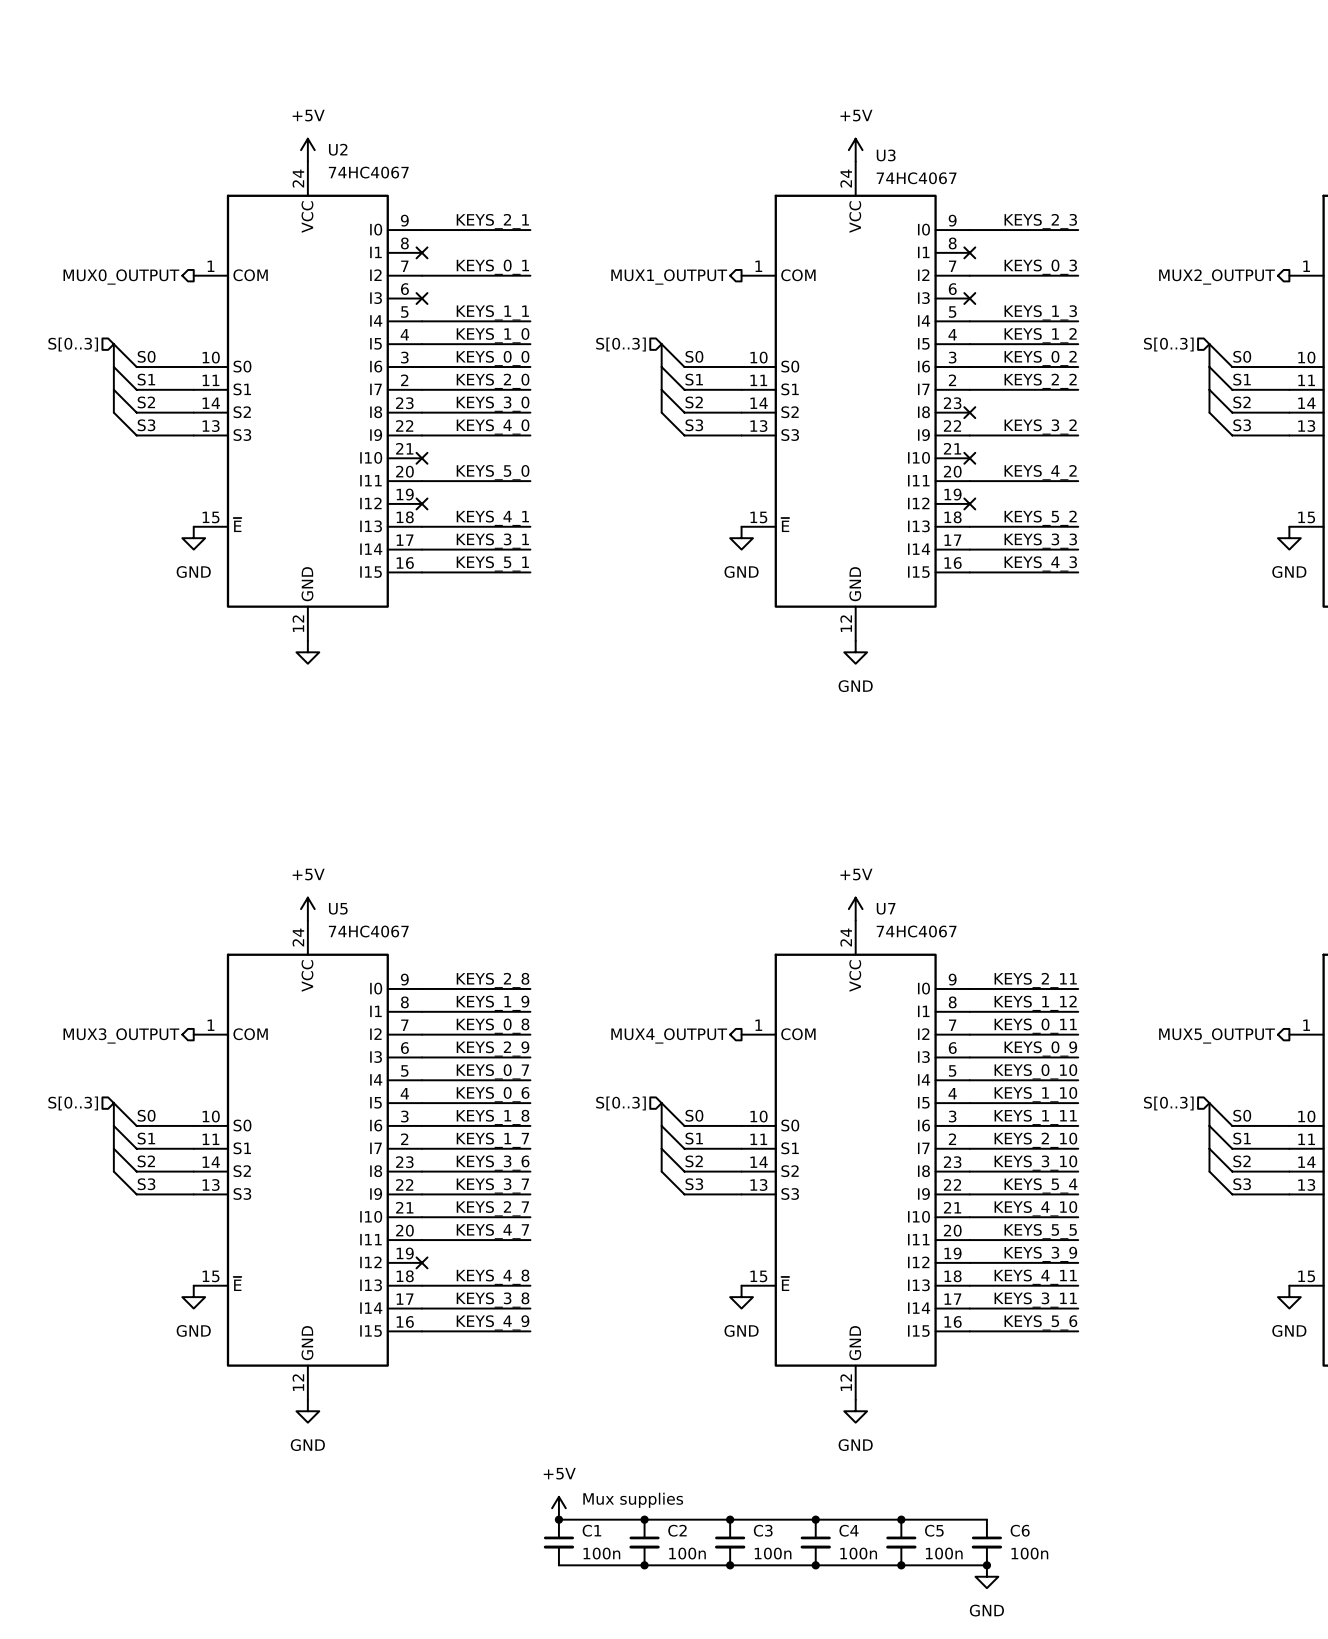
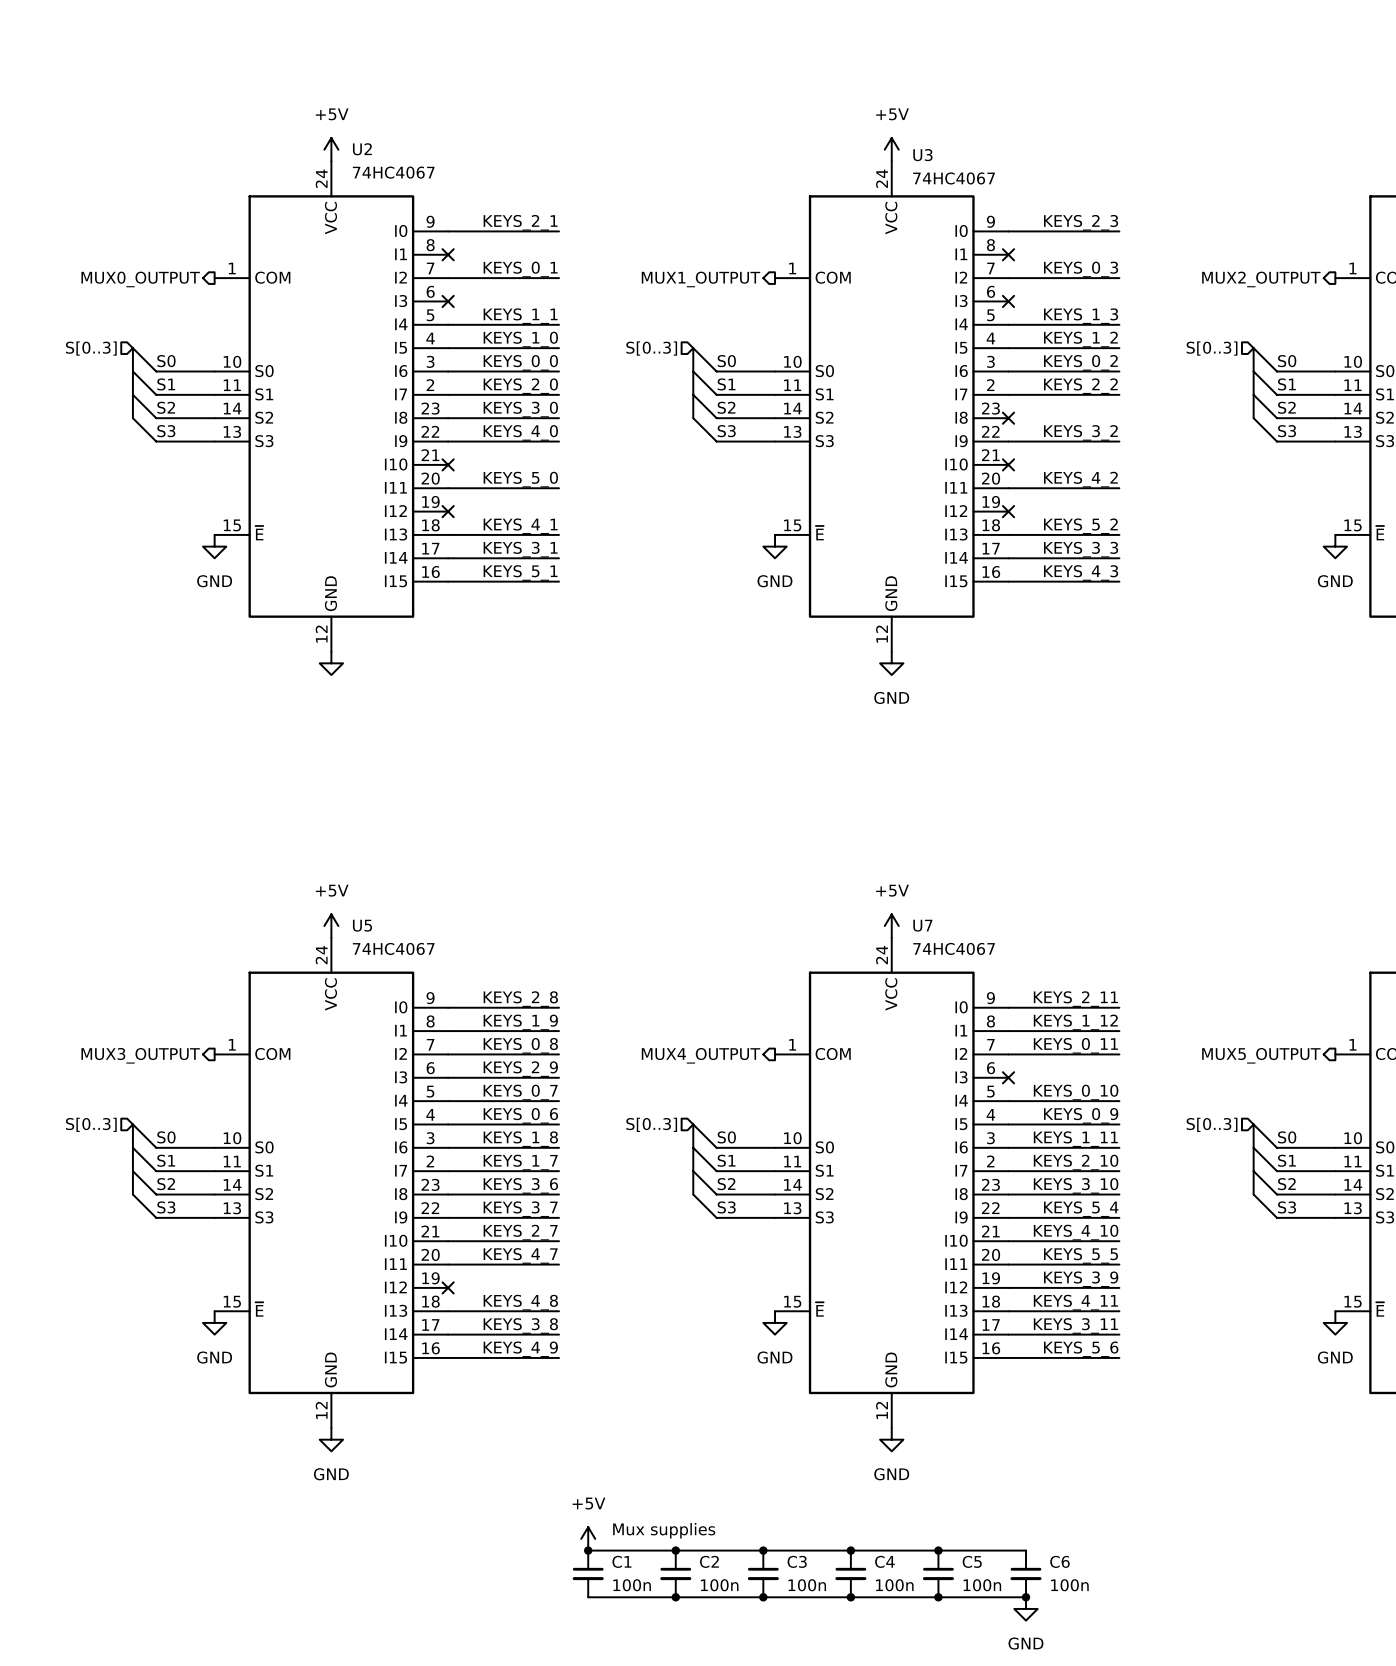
label: KEYS_0_9 (1040, 1049) -> none
wire: (969, 1057) (1078, 1057) -> none
no-connect mark: none -> (1008, 1077)
label: KEYS_1_10 (1035, 1094) -> KEYS_0_9 (1081, 1115)

